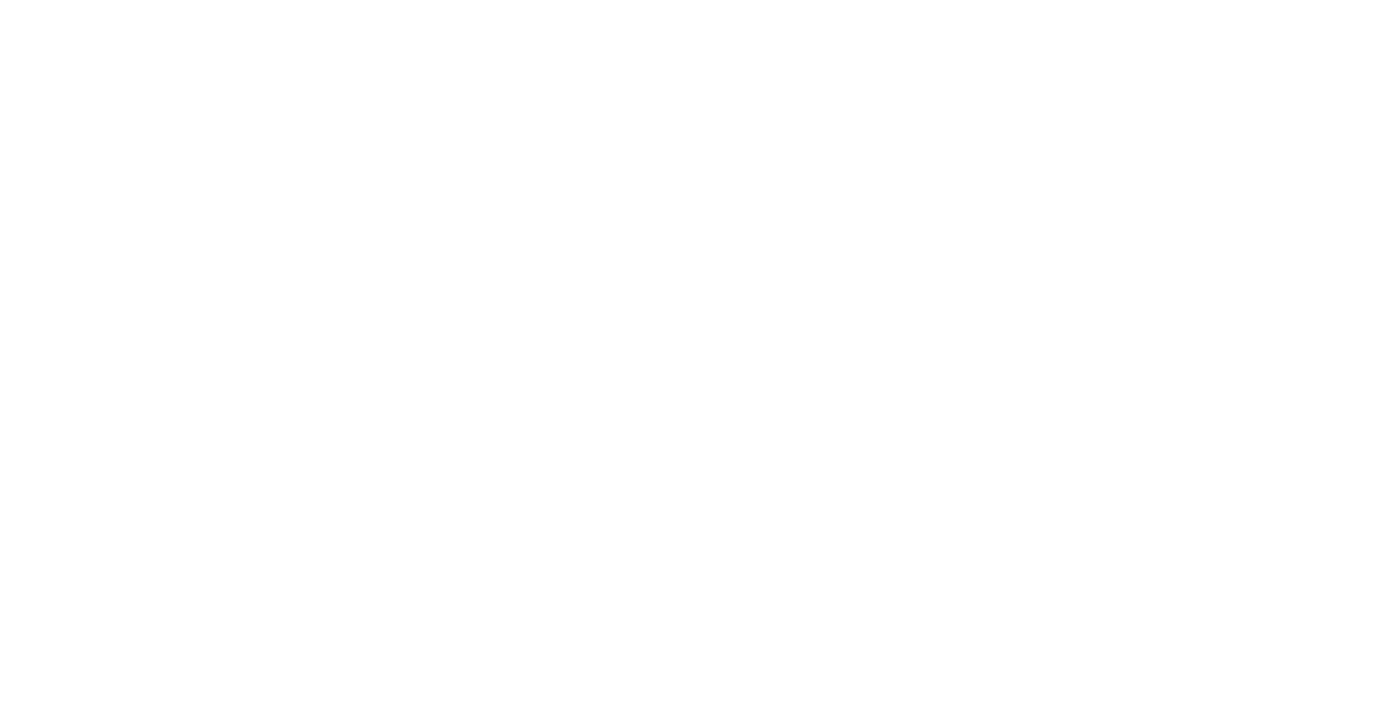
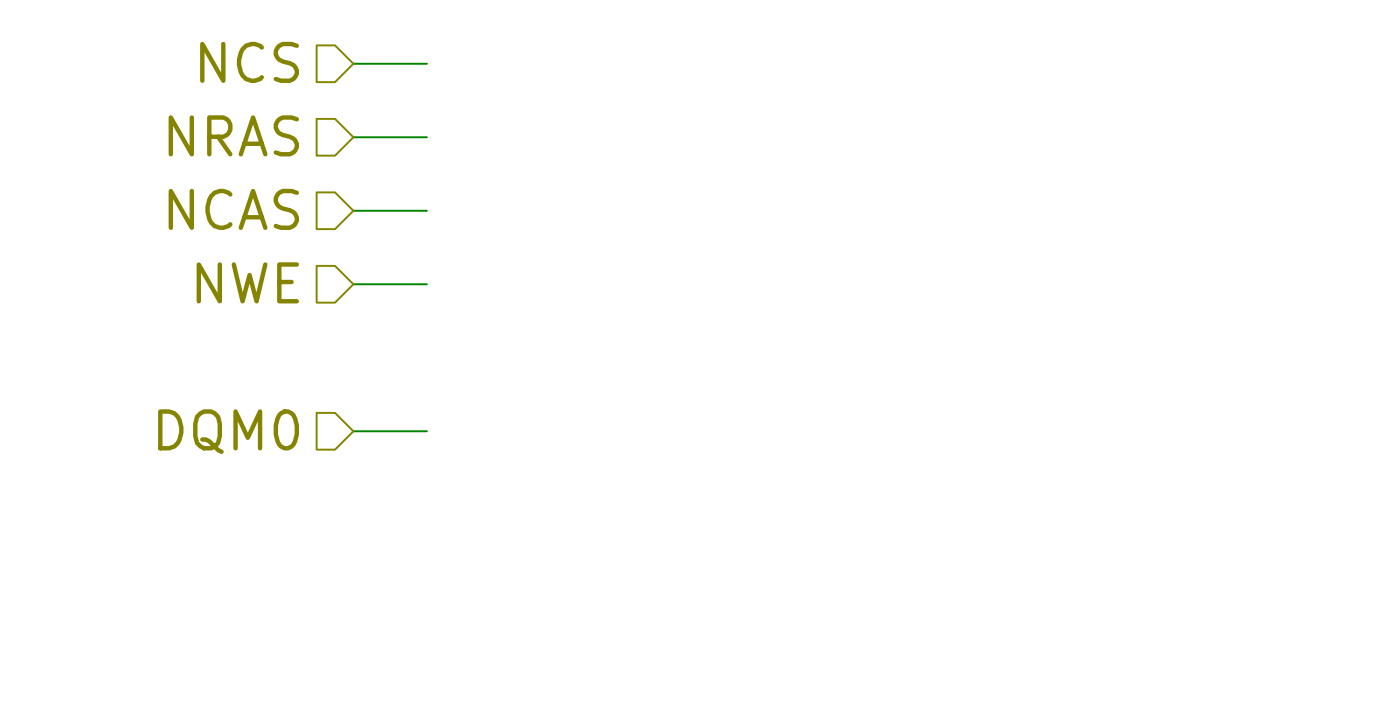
hierarchical label: none -> NCS (249, 62)
wire: none -> (353, 63) (426, 63)
hierarchical label: none -> NRAS (233, 135)
wire: none -> (353, 137) (426, 137)
hierarchical label: none -> NCAS (233, 209)
wire: none -> (353, 210) (426, 210)
hierarchical label: none -> NWE (247, 282)
wire: none -> (353, 284) (426, 284)
hierarchical label: none -> DQM0 (228, 431)
wire: none -> (353, 431) (426, 431)

